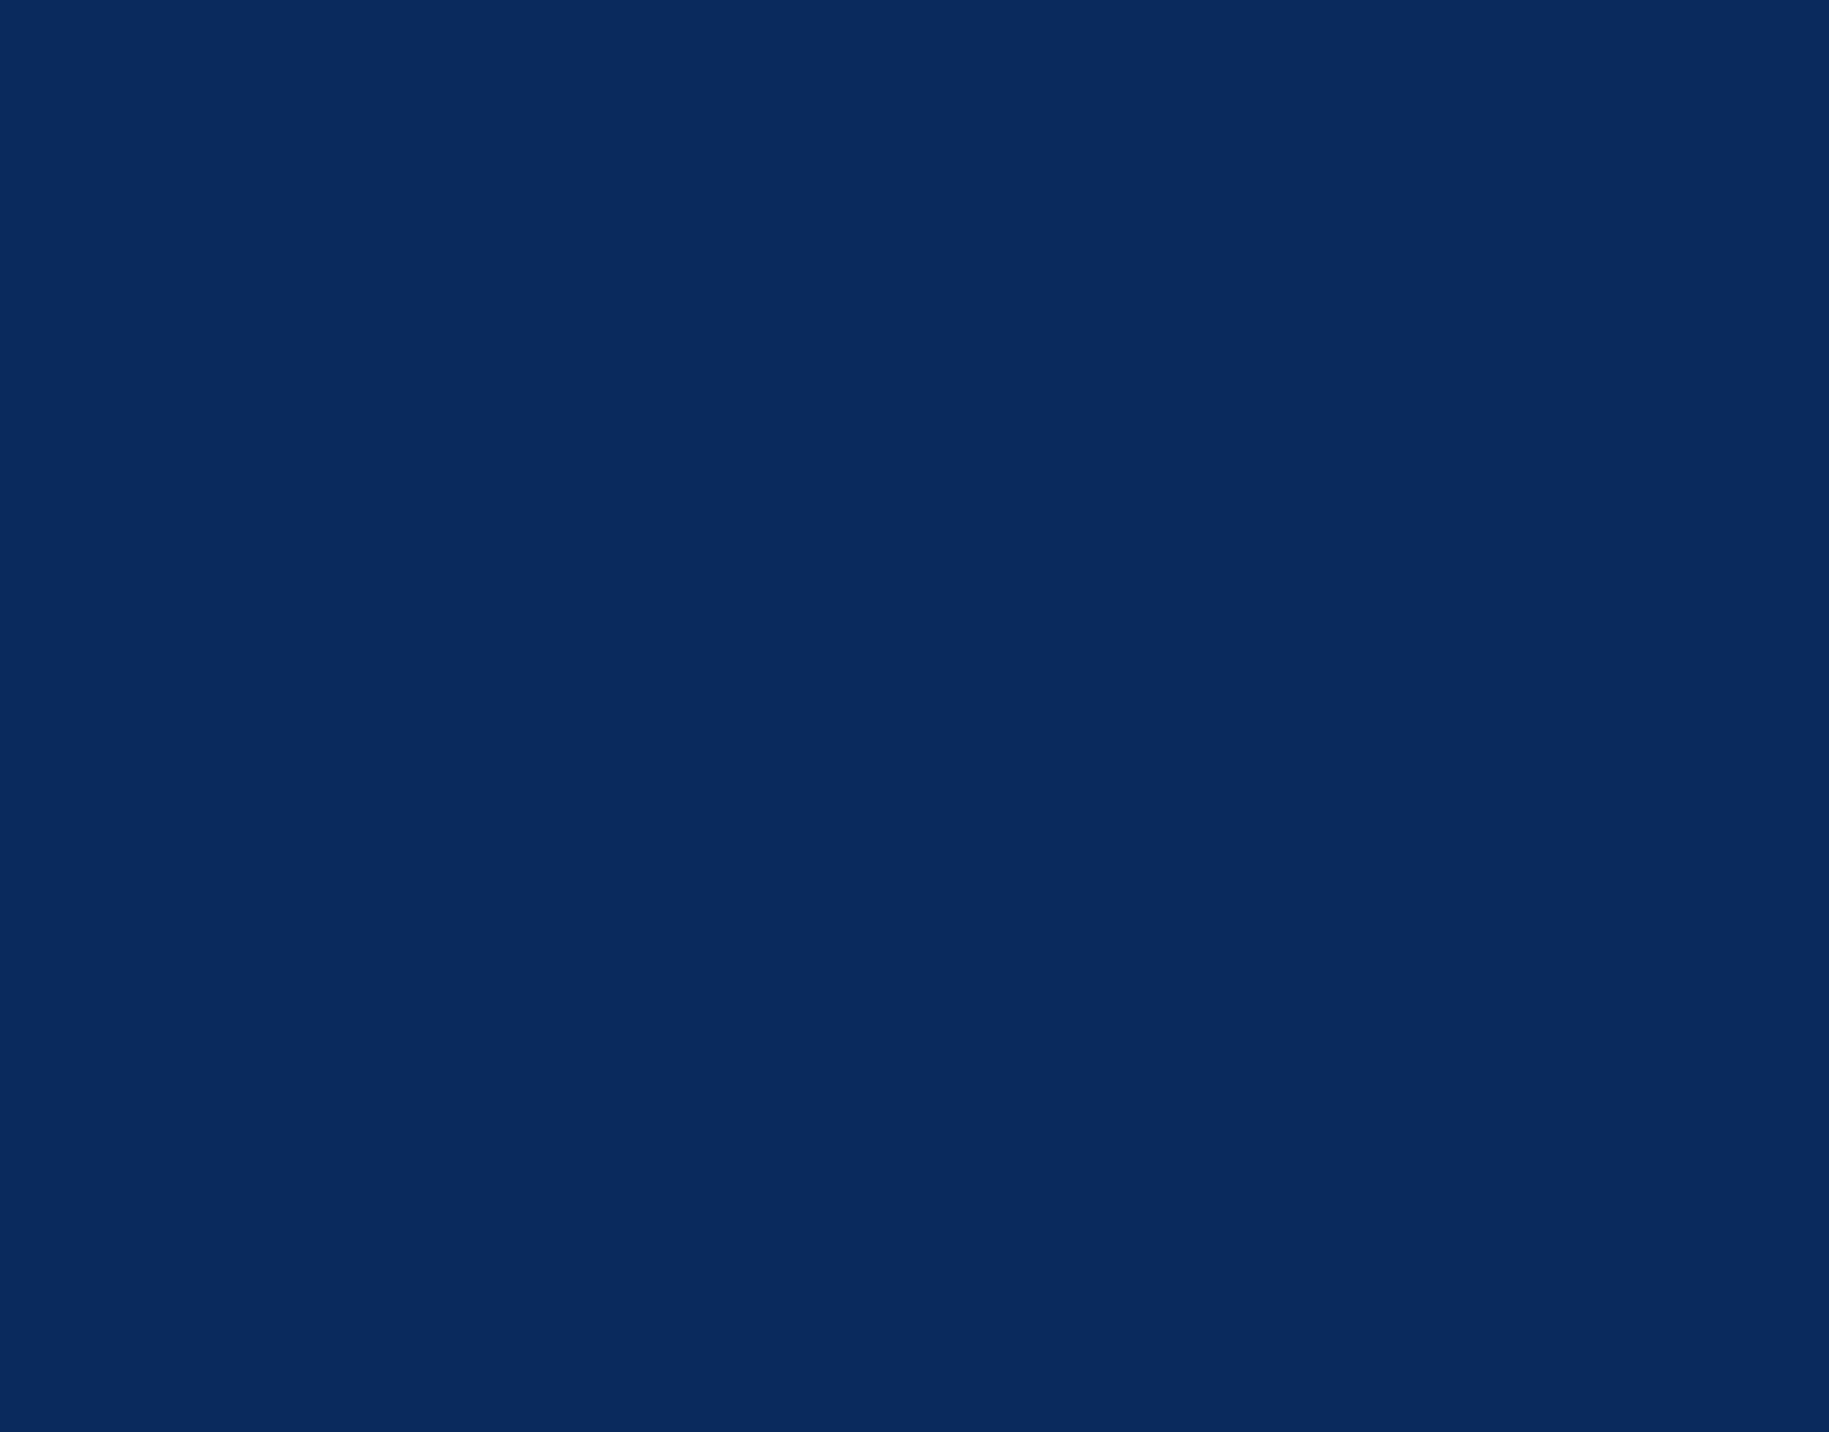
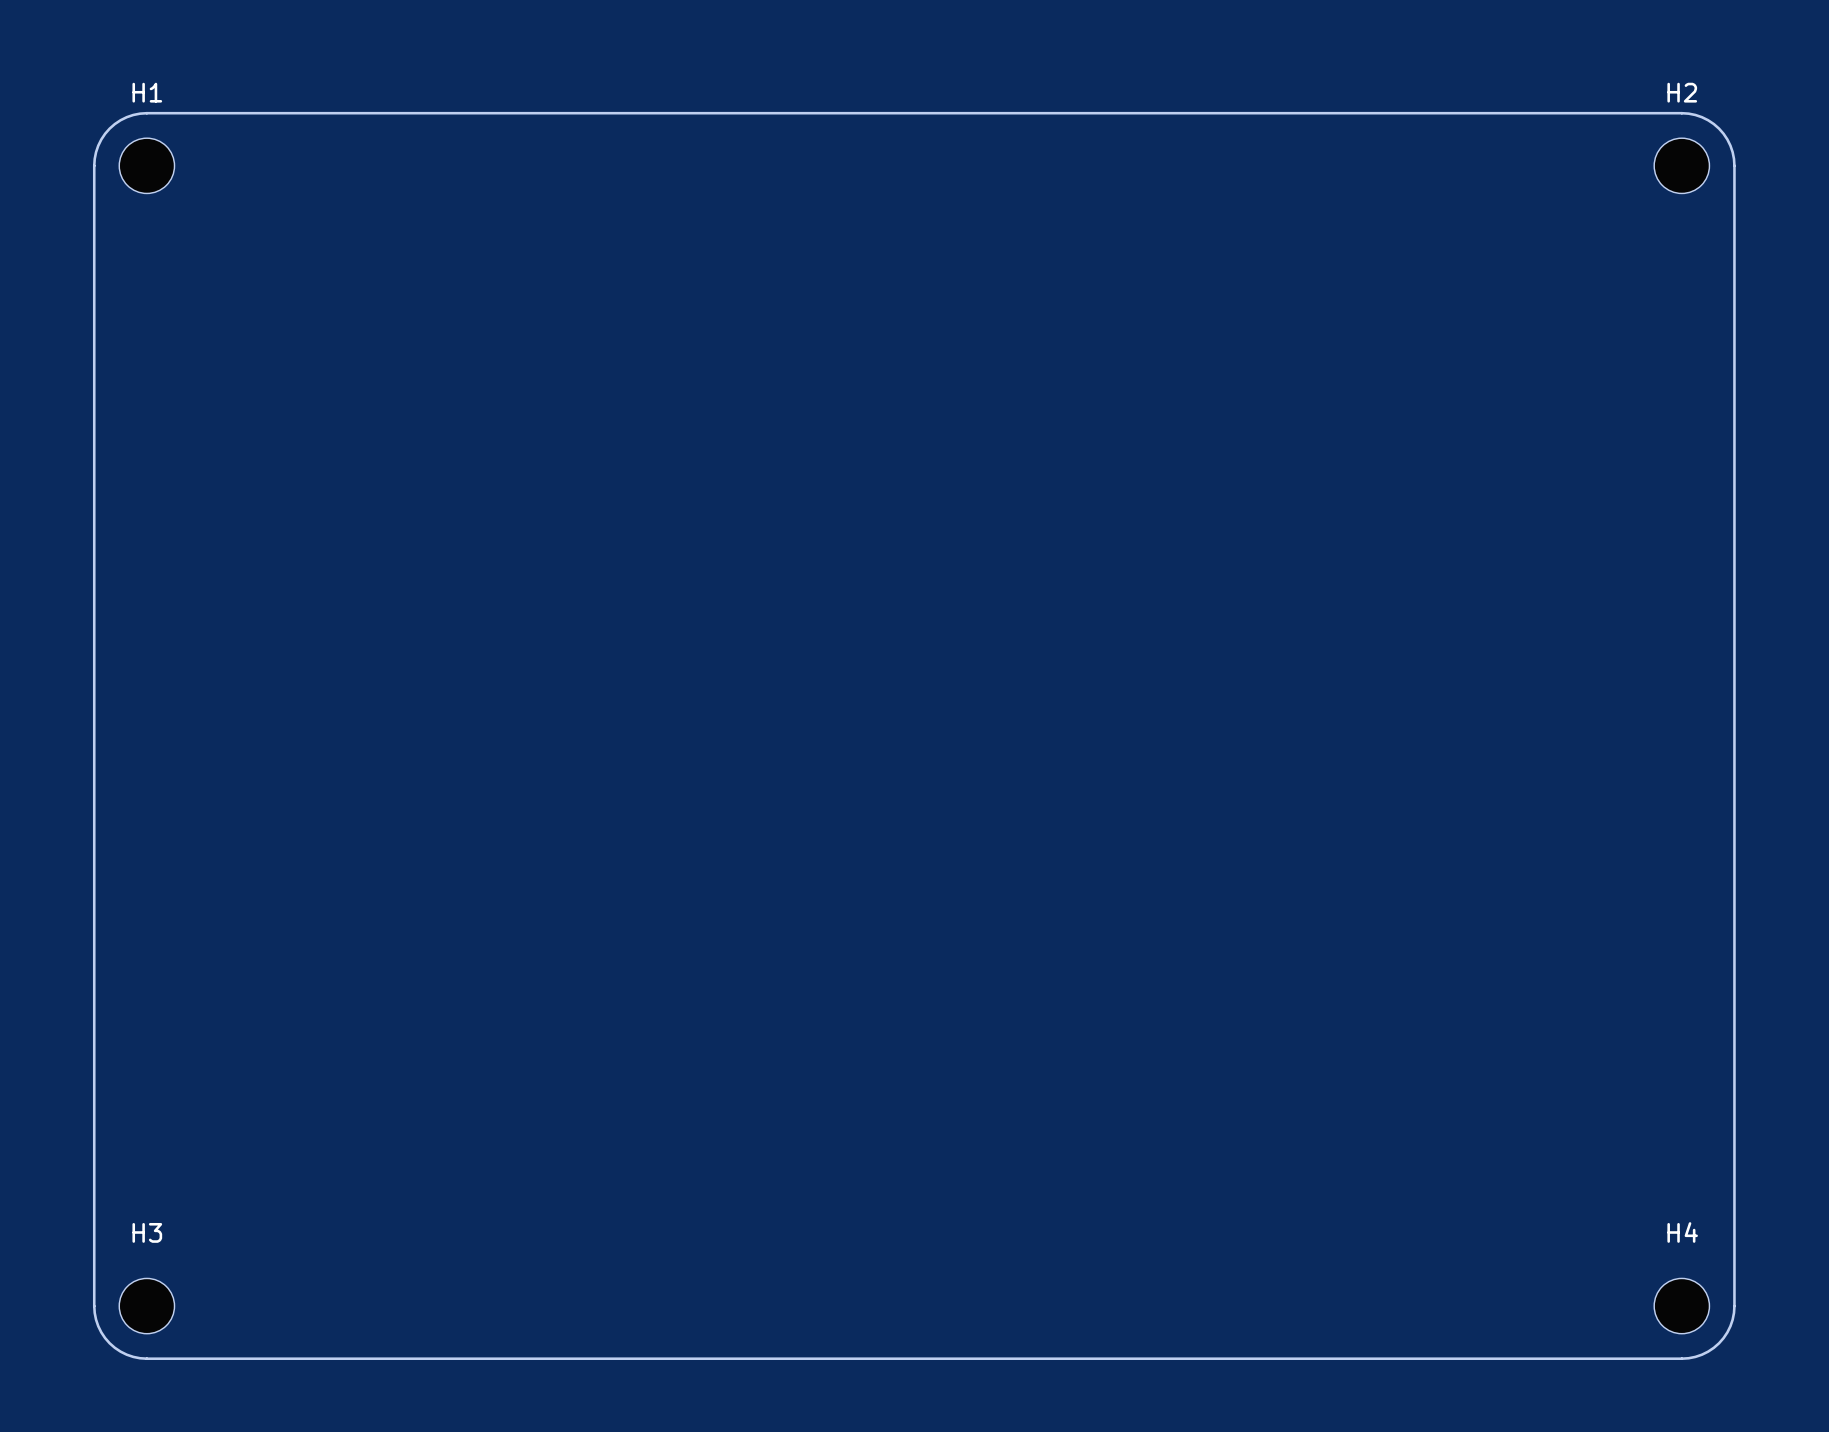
board edge: none -> (146, 113) (1681, 113) (1695, 114) (1713, 124) (1723, 133) (1730, 145) (1734, 165) (1734, 1306) (1732, 1319) (1723, 1338) (1713, 1347) (1701, 1354) (1681, 1358) (146, 1358) (133, 1356) (114, 1347) (105, 1338) (98, 1326) (94, 1306) (94, 165) (98, 145) (109, 128) (126, 117) (146, 113)
H1: none -> (146, 165)
H2: none -> (1681, 165)
H3: none -> (146, 1306)
H4: none -> (1681, 1306)

